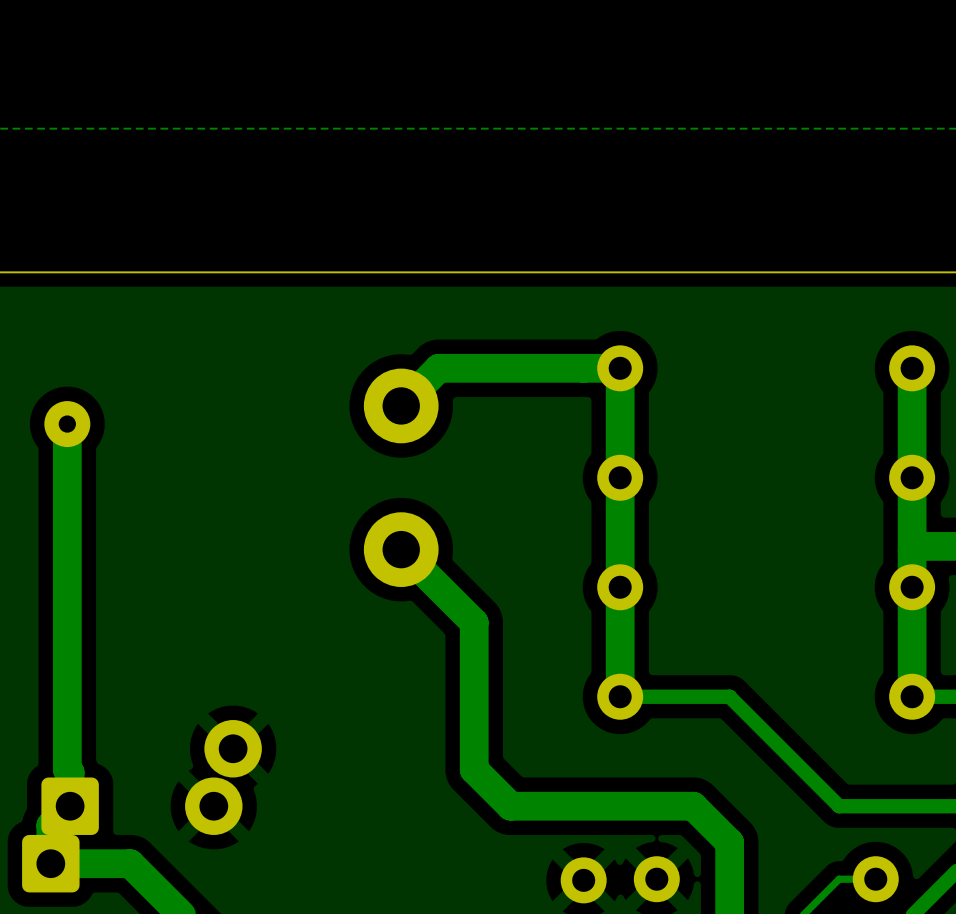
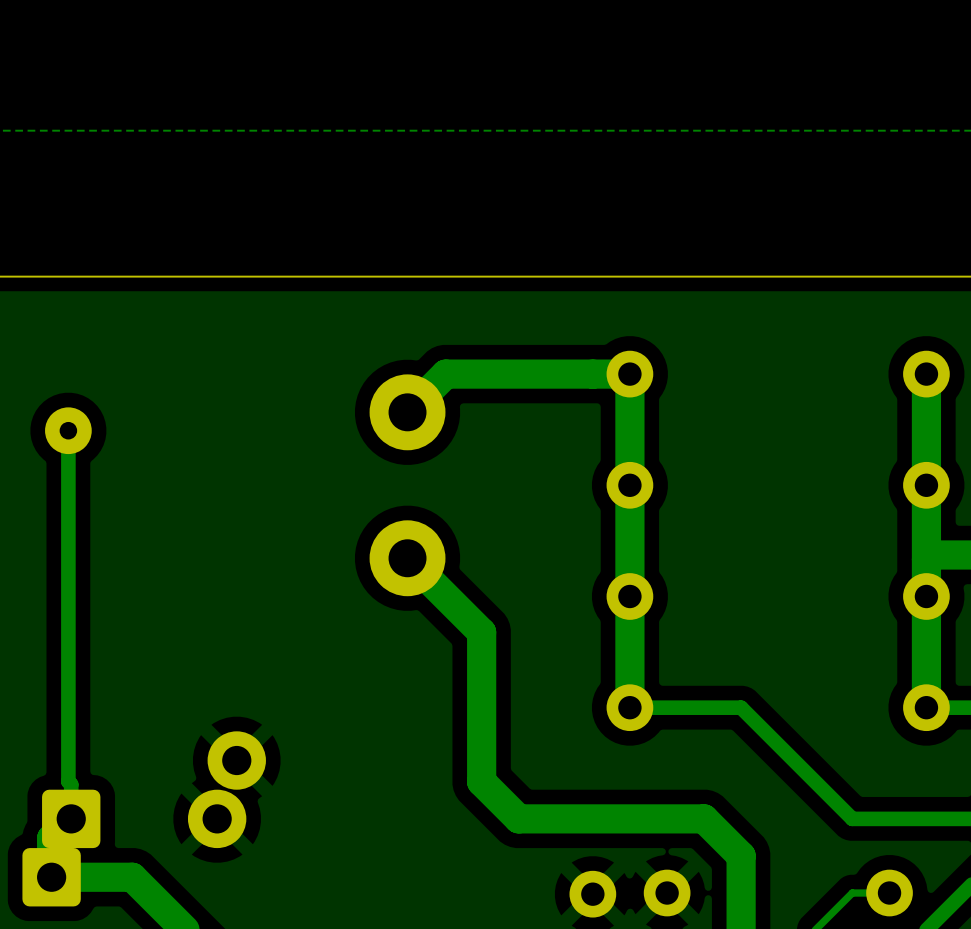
track width: thick (67, 424) (67, 769) (70, 772) (70, 806) -> thin (68, 430) (68, 781) (71, 784) (71, 818)

